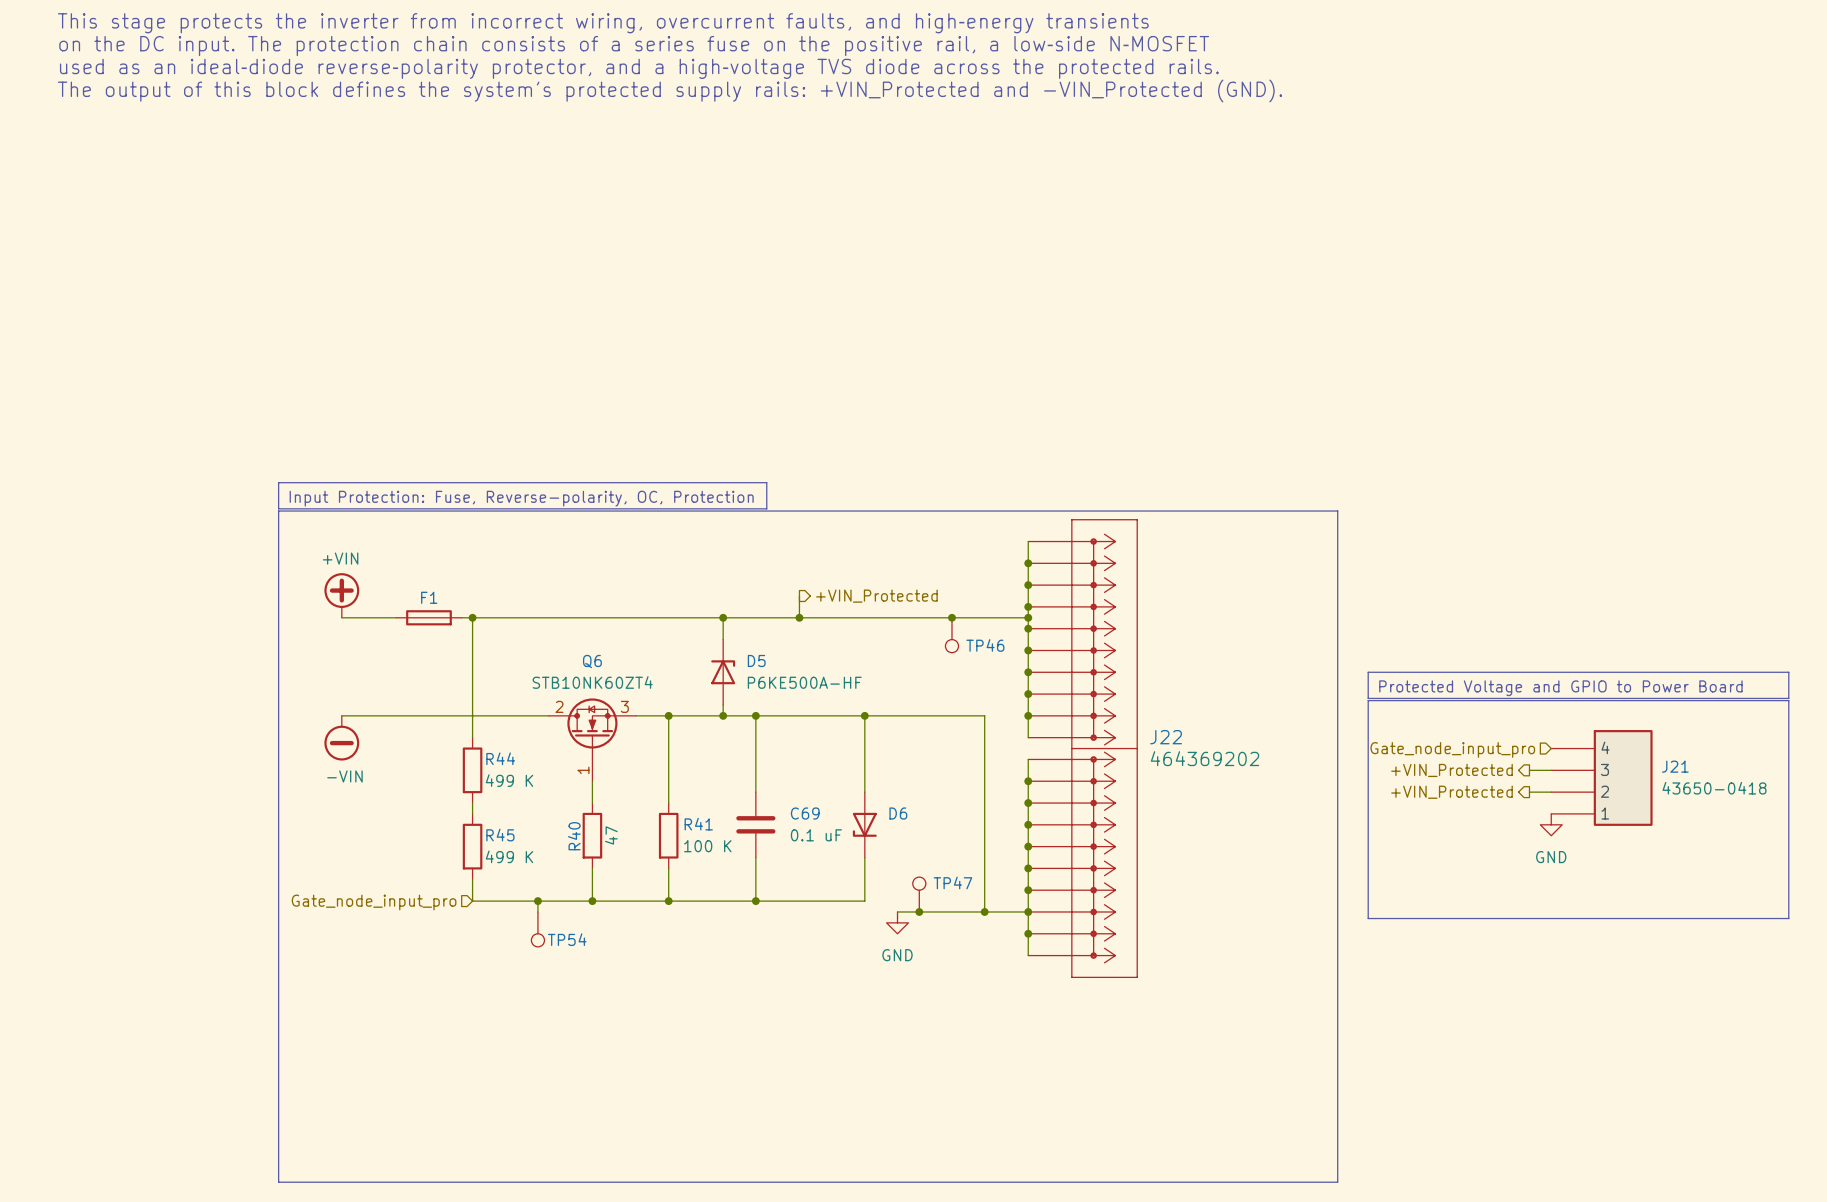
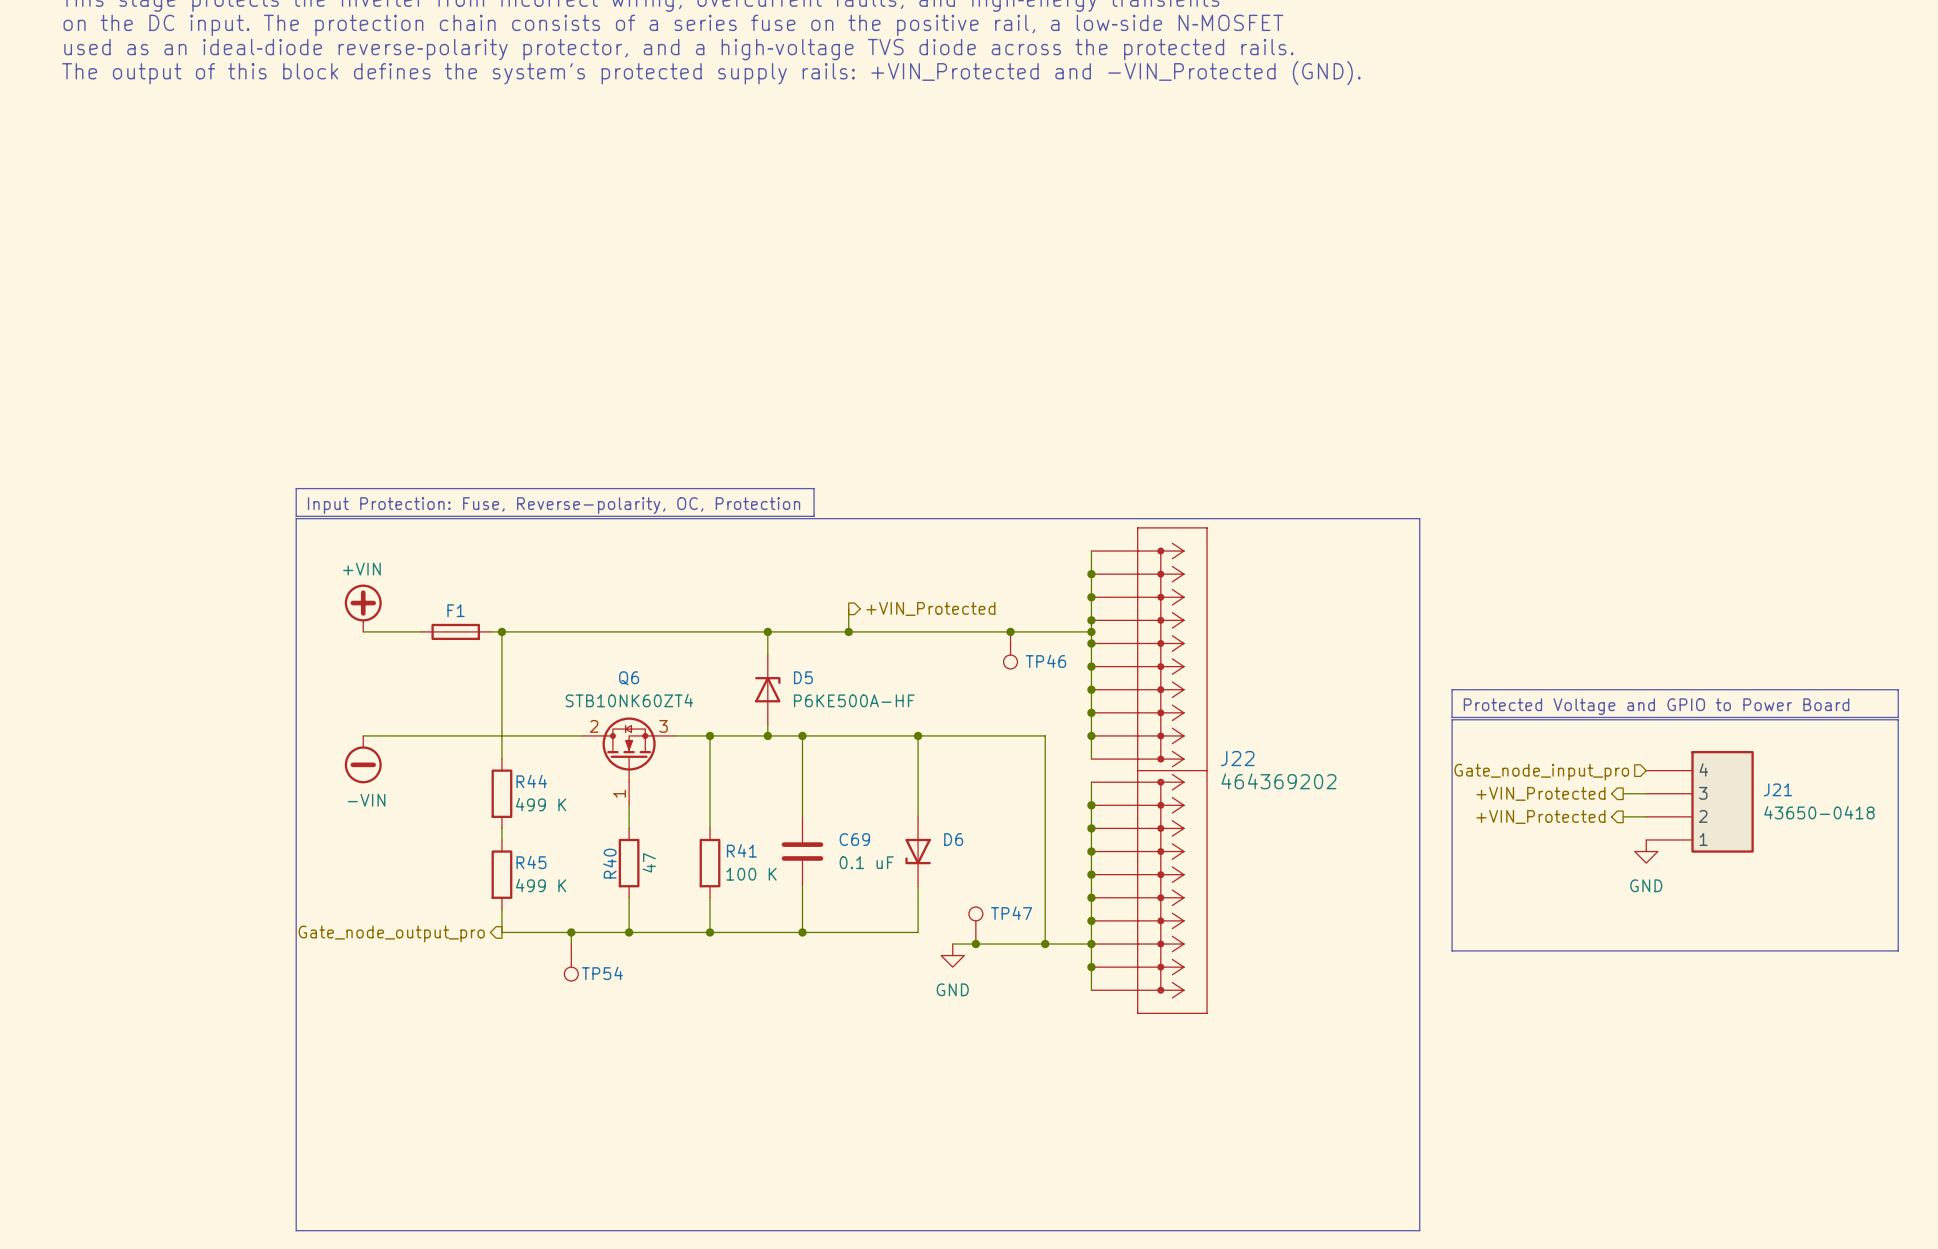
hierarchical label shape: input (374, 902) -> output (391, 933)
hierarchical label: Gate_node_input_pro (374, 902) -> Gate_node_output_pro (391, 933)

